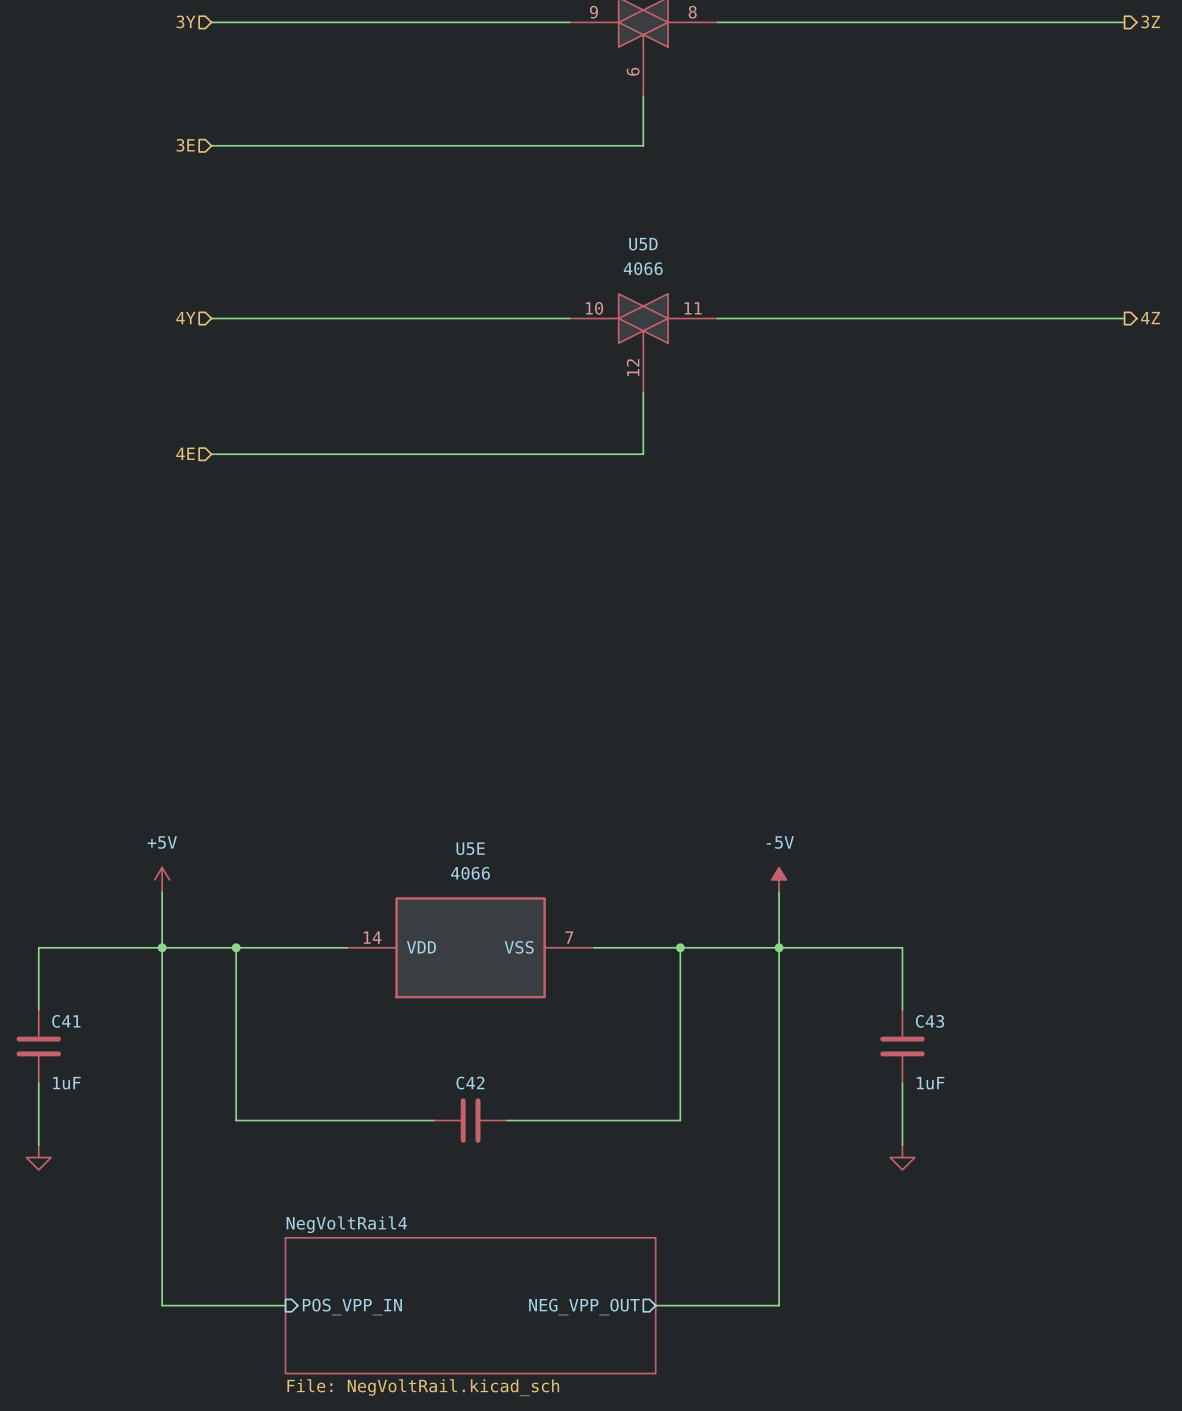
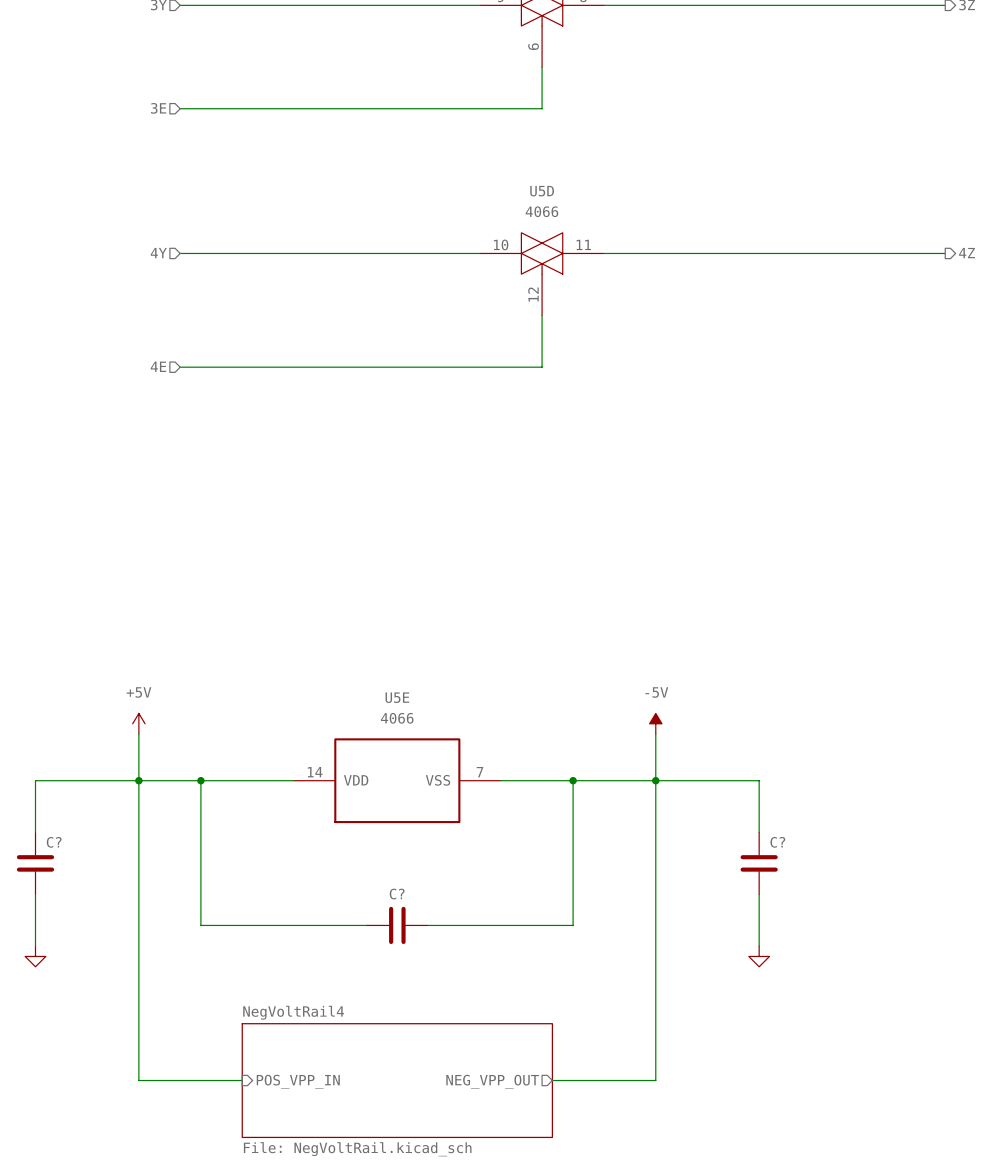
C41 name: C41 (66, 1021) -> C? (54, 842)
C43 name: C43 (930, 1021) -> C? (777, 842)
C41 value: 1uF (66, 1083) -> none
C42 name: C42 (470, 1083) -> C? (397, 894)
C43 value: 1uF (930, 1083) -> none

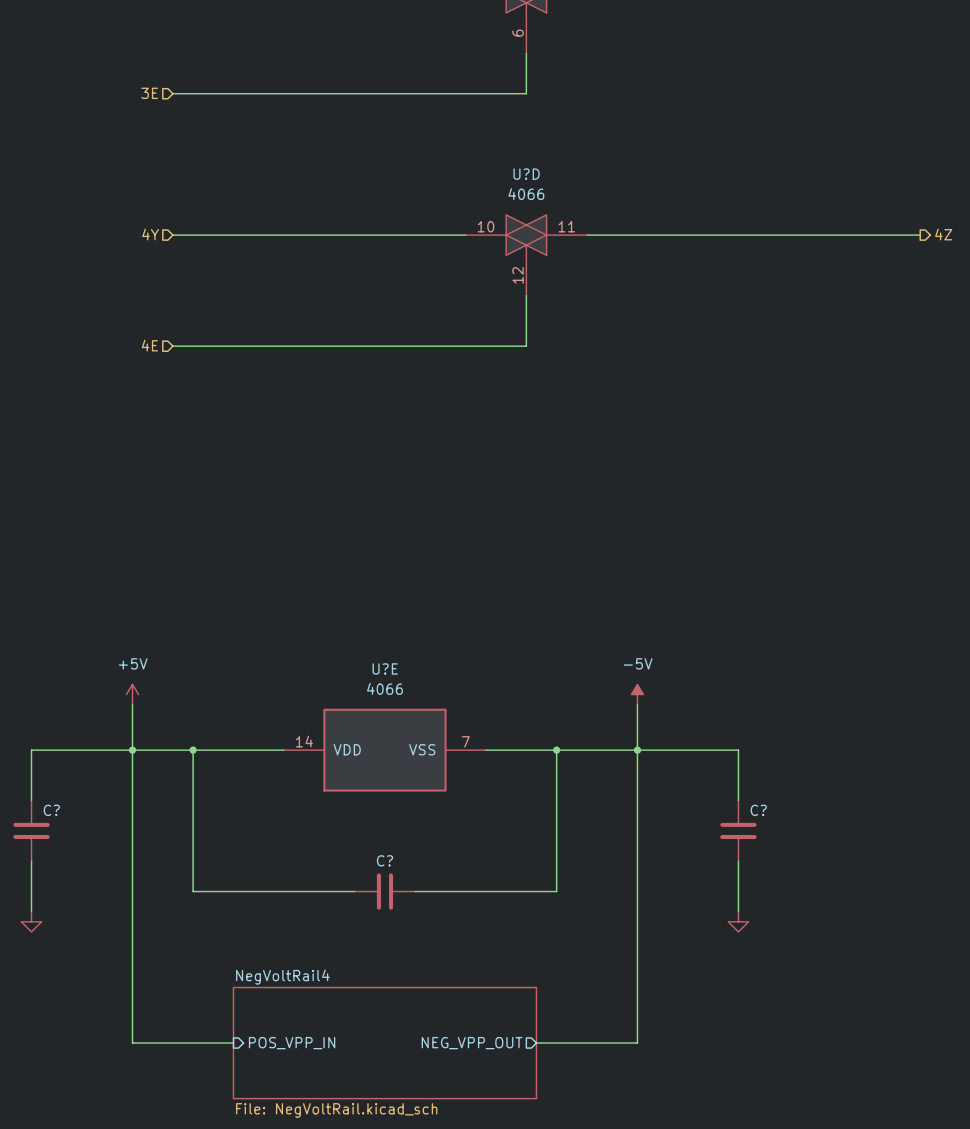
U5D name: U5D (542, 191) -> U?D (526, 174)
U5E name: U5E (397, 697) -> U?E (385, 668)

